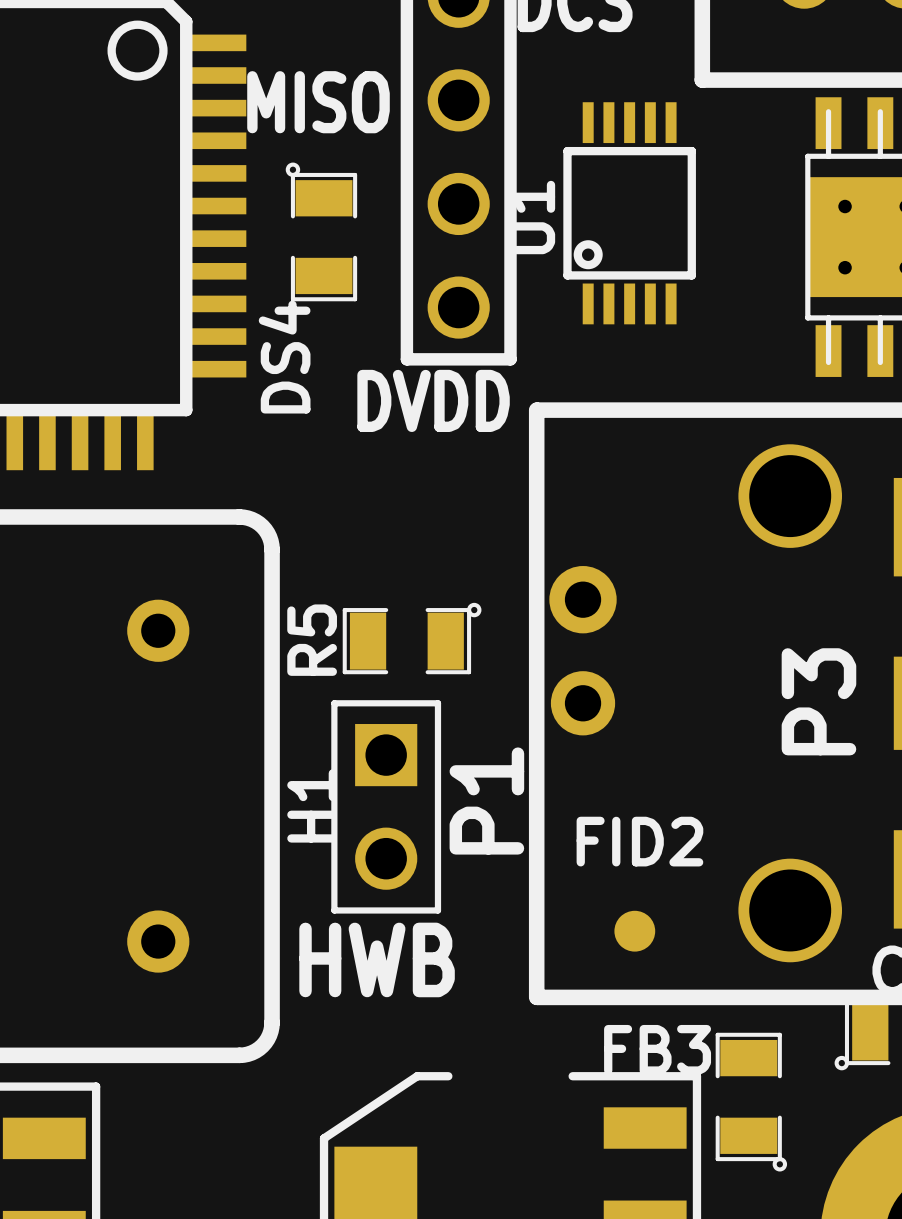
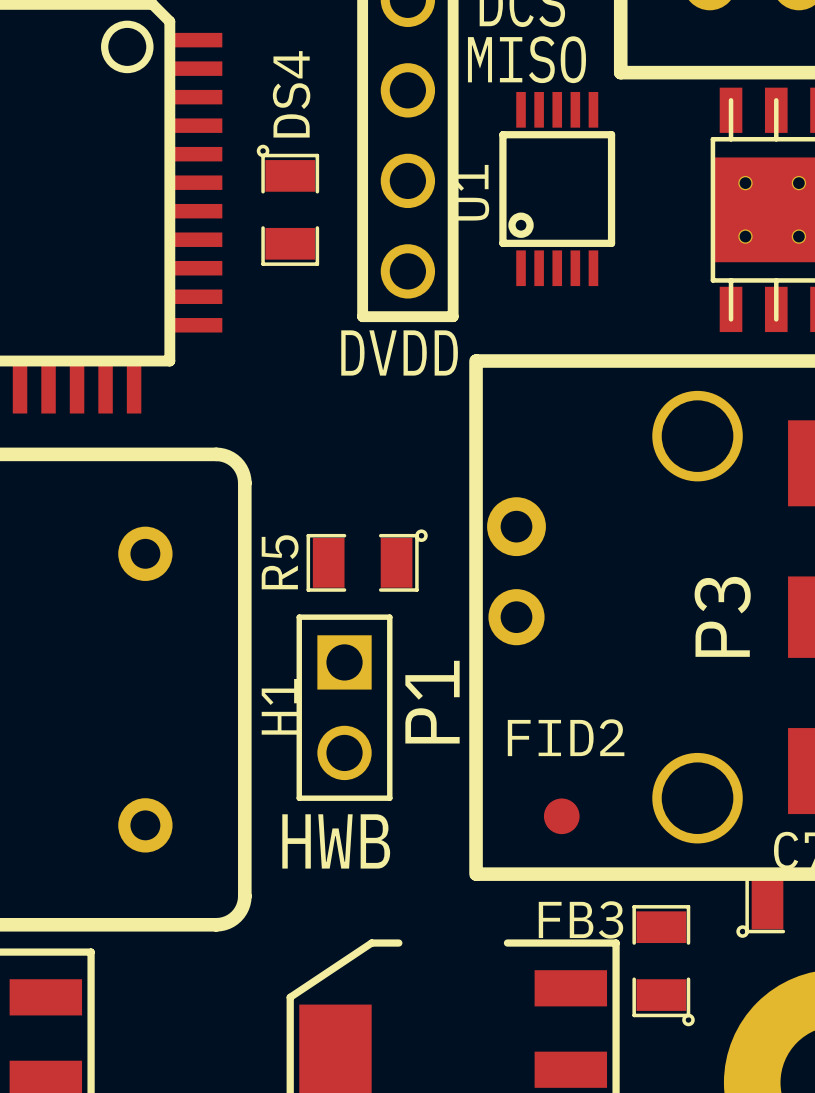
text position: MISO (318, 102) -> MISO (526, 59)
DS4 name position: DS4 (284, 357) -> DS4 (291, 94)

